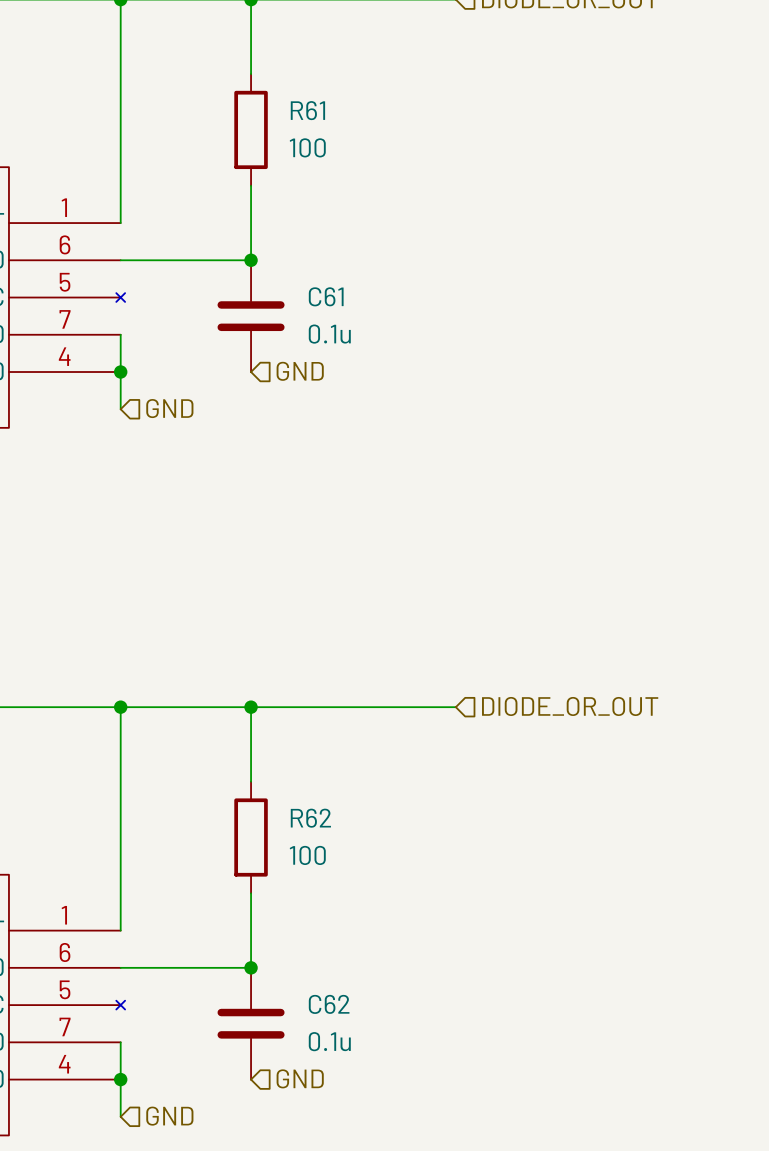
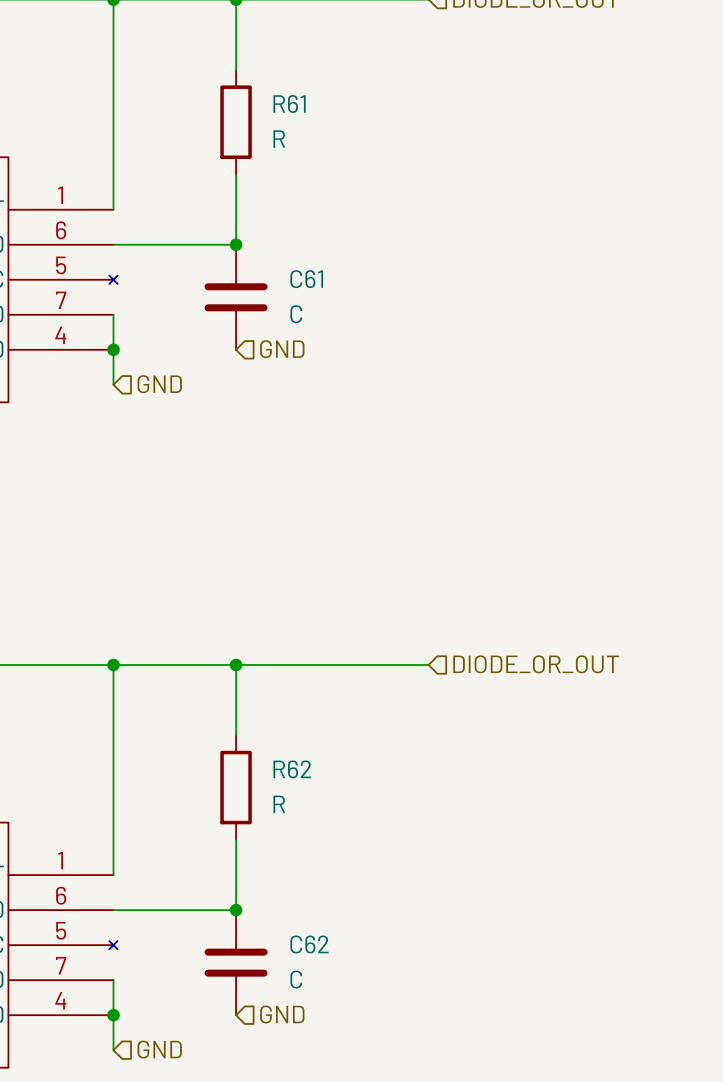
R61 value: 100 (307, 147) -> R (279, 139)
C61 value: 0.1u (329, 334) -> C (296, 314)
R62 value: 100 (307, 855) -> R (279, 804)
C62 value: 0.1u (329, 1041) -> C (296, 979)

